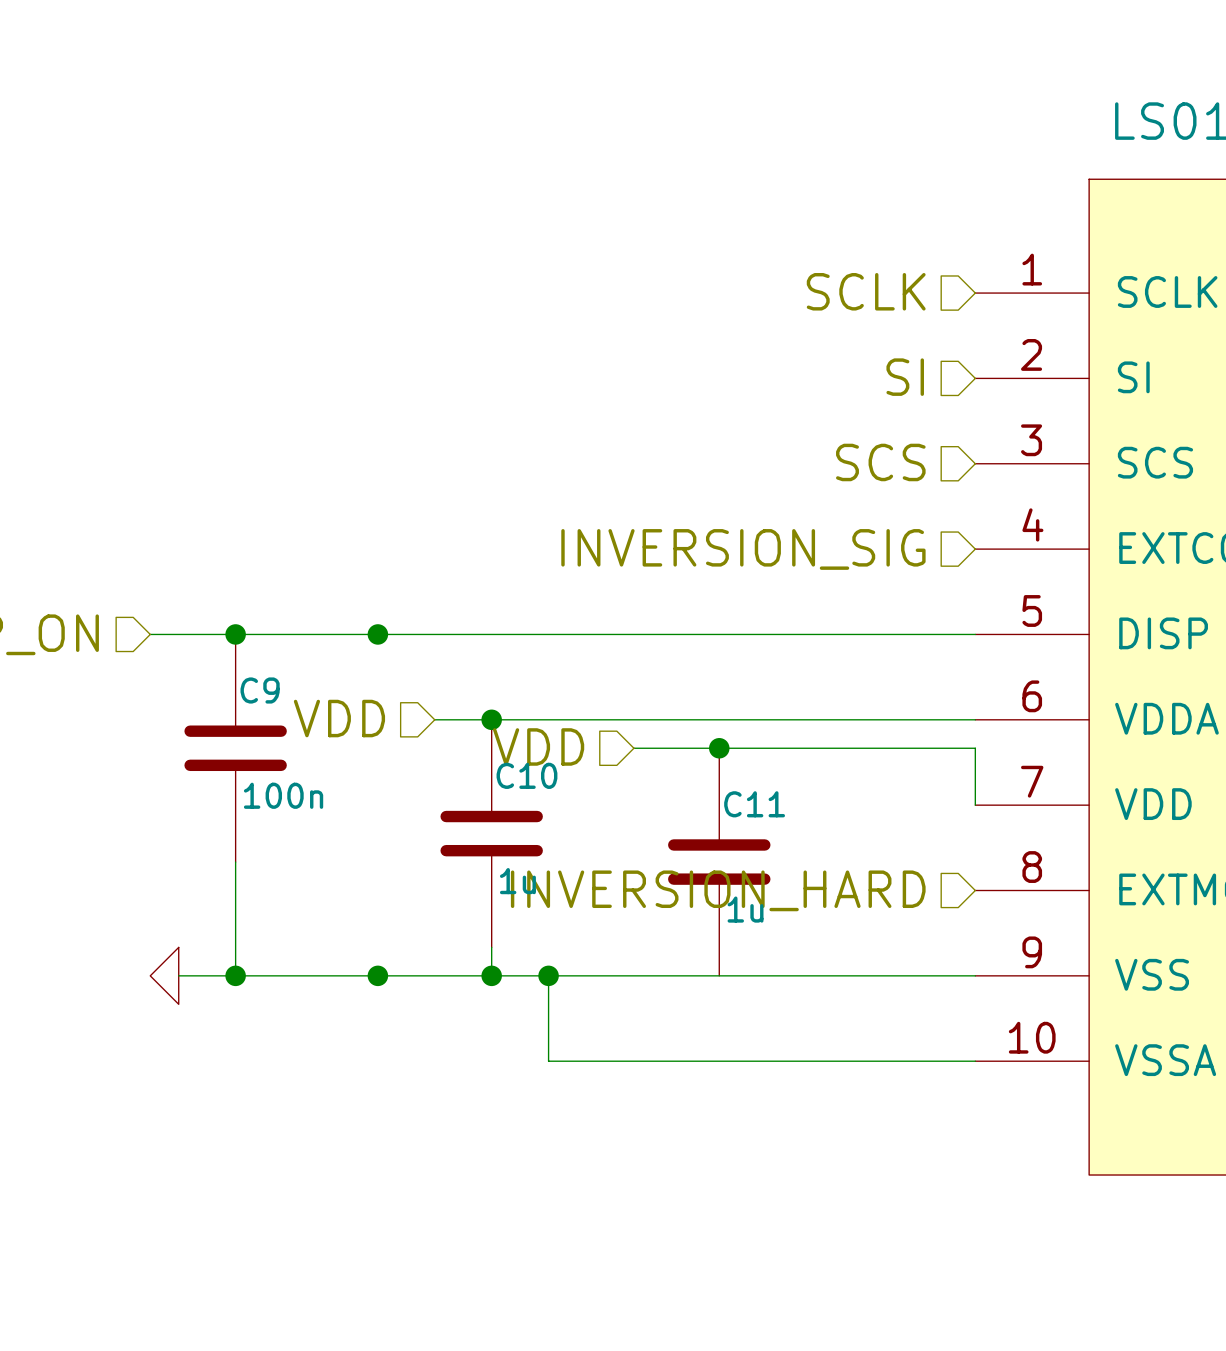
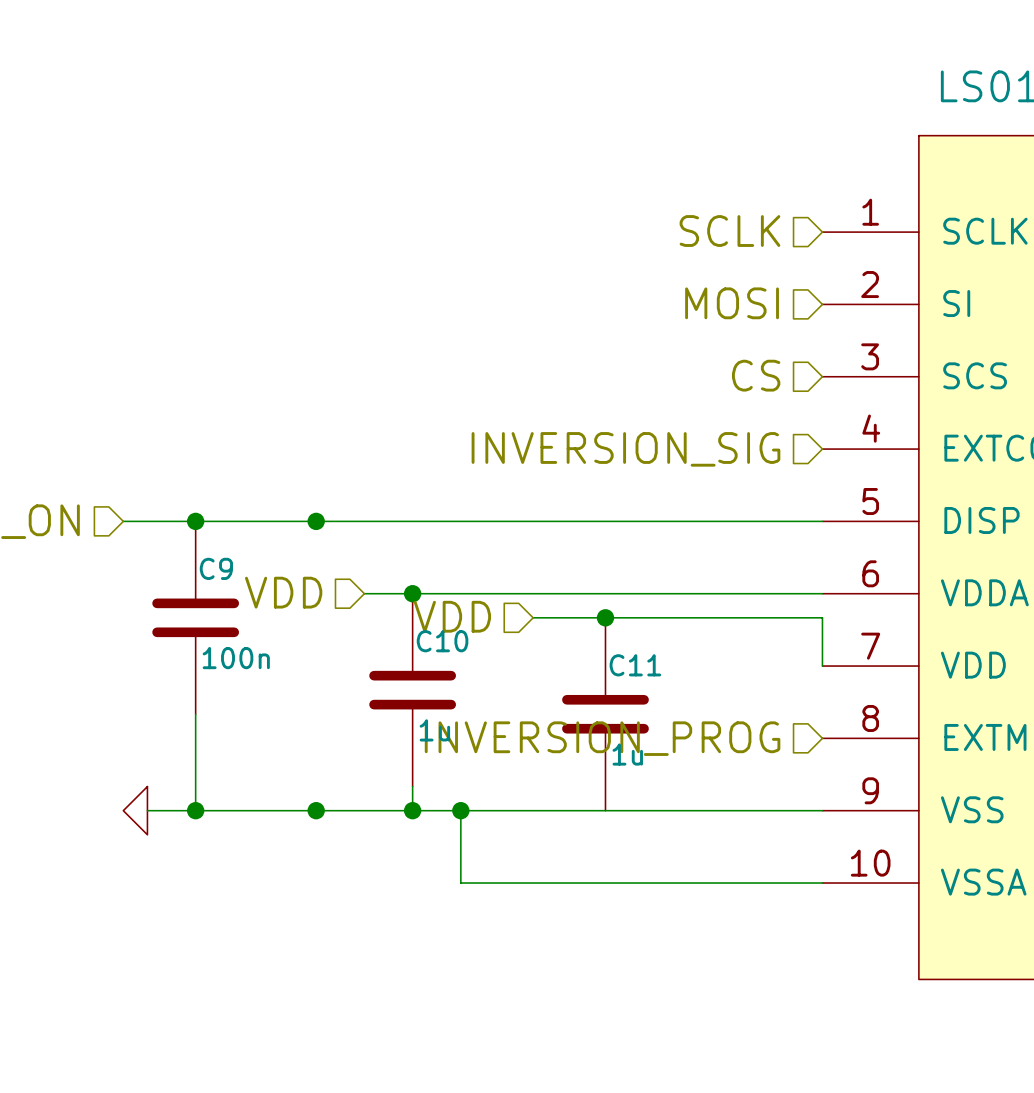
hierarchical label: SI (905, 377) -> MOSI (732, 303)
hierarchical label: SCS (880, 462) -> CS (756, 375)
hierarchical label: INVERSION_HARD (718, 890) -> INVERSION_PROG (602, 738)

